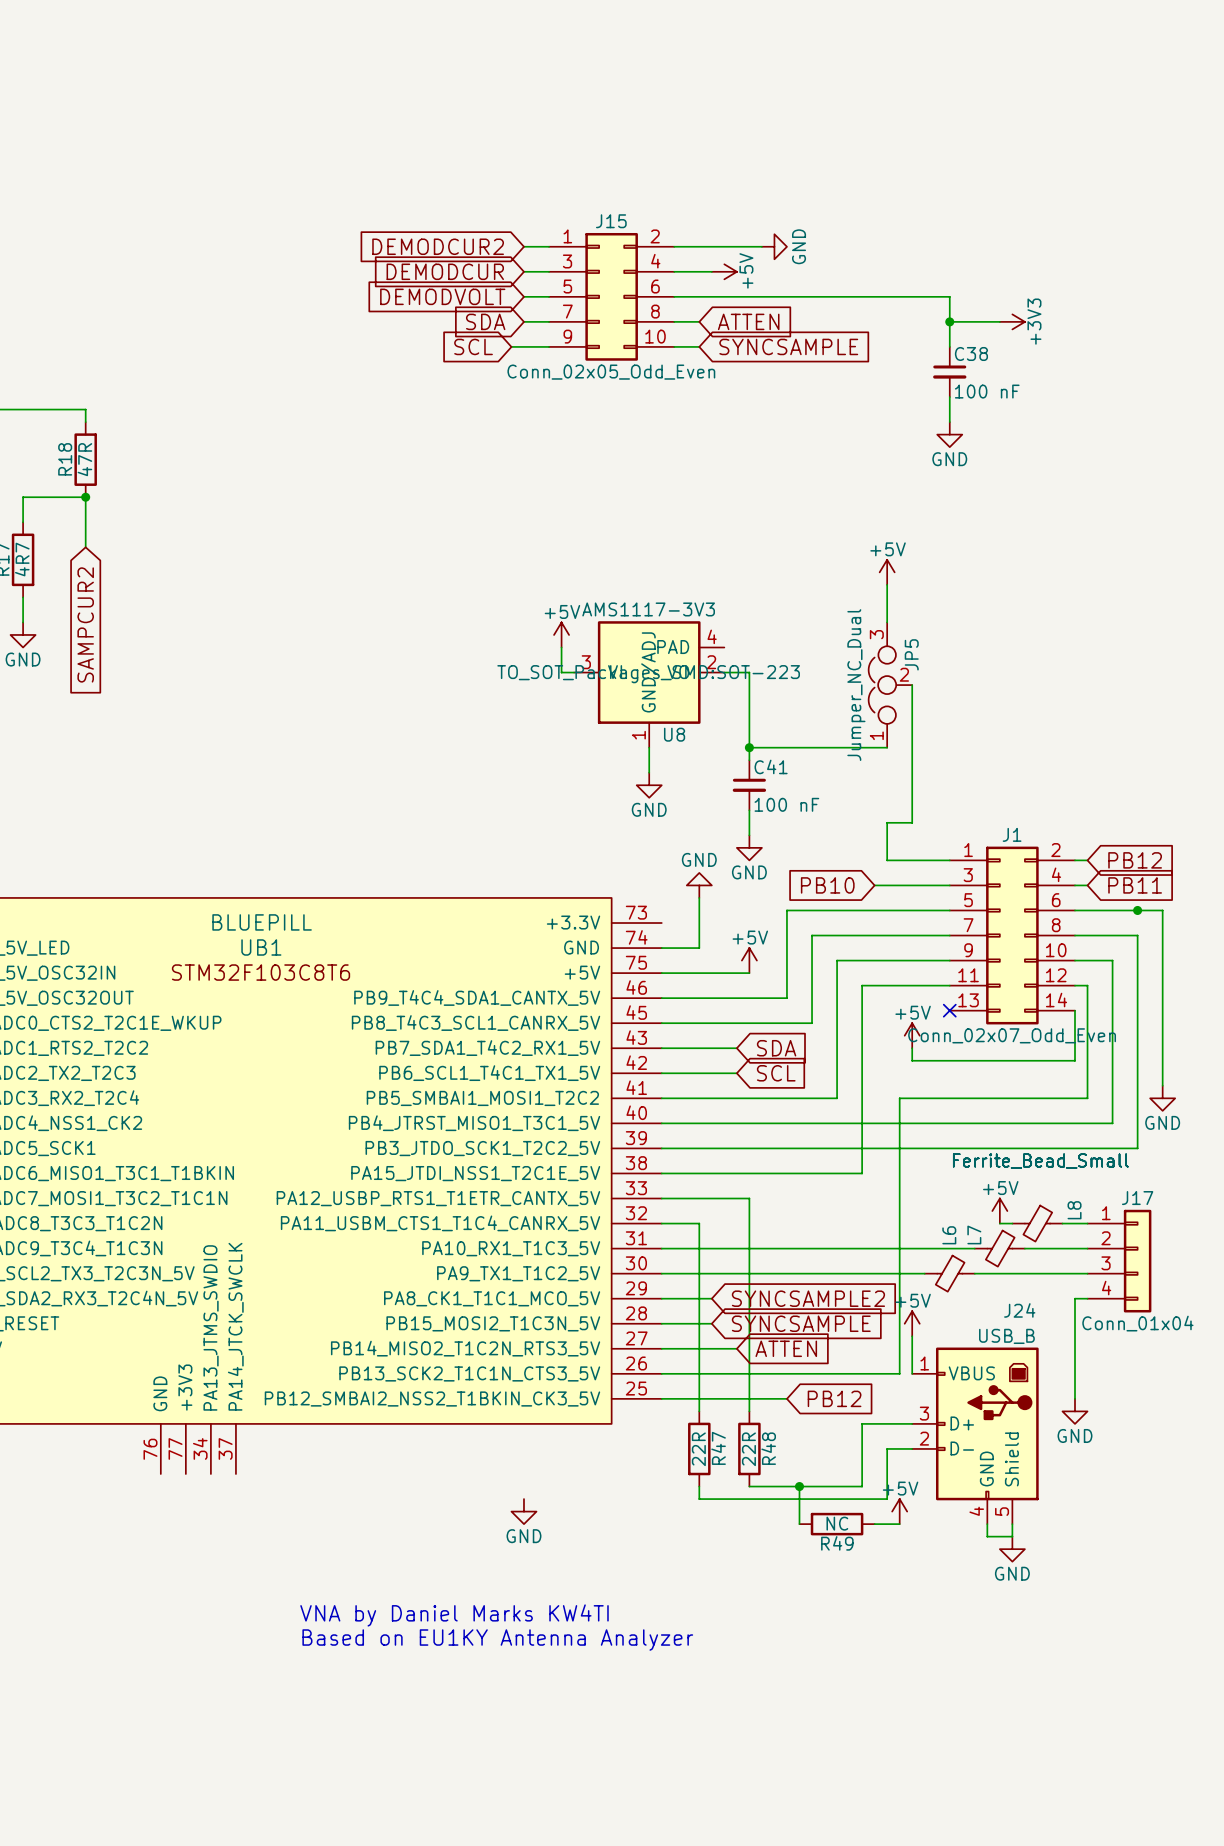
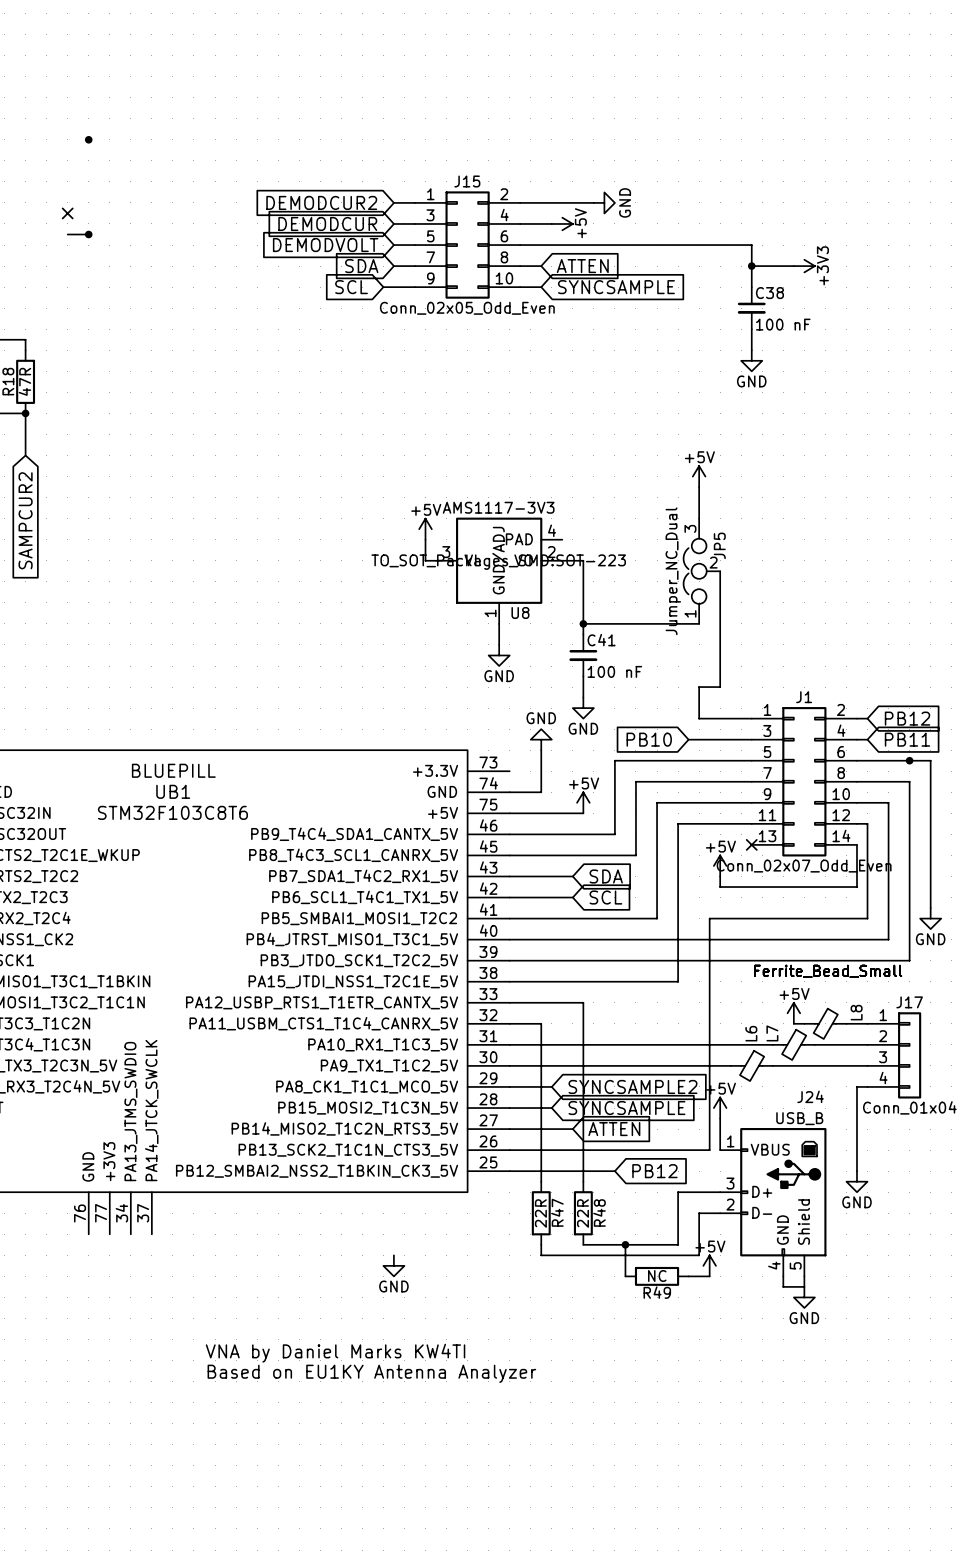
junction: none -> (88, 139)
no-connect mark: none -> (67, 213)
wire: none -> (67, 234) (88, 234)
junction: none -> (88, 234)

